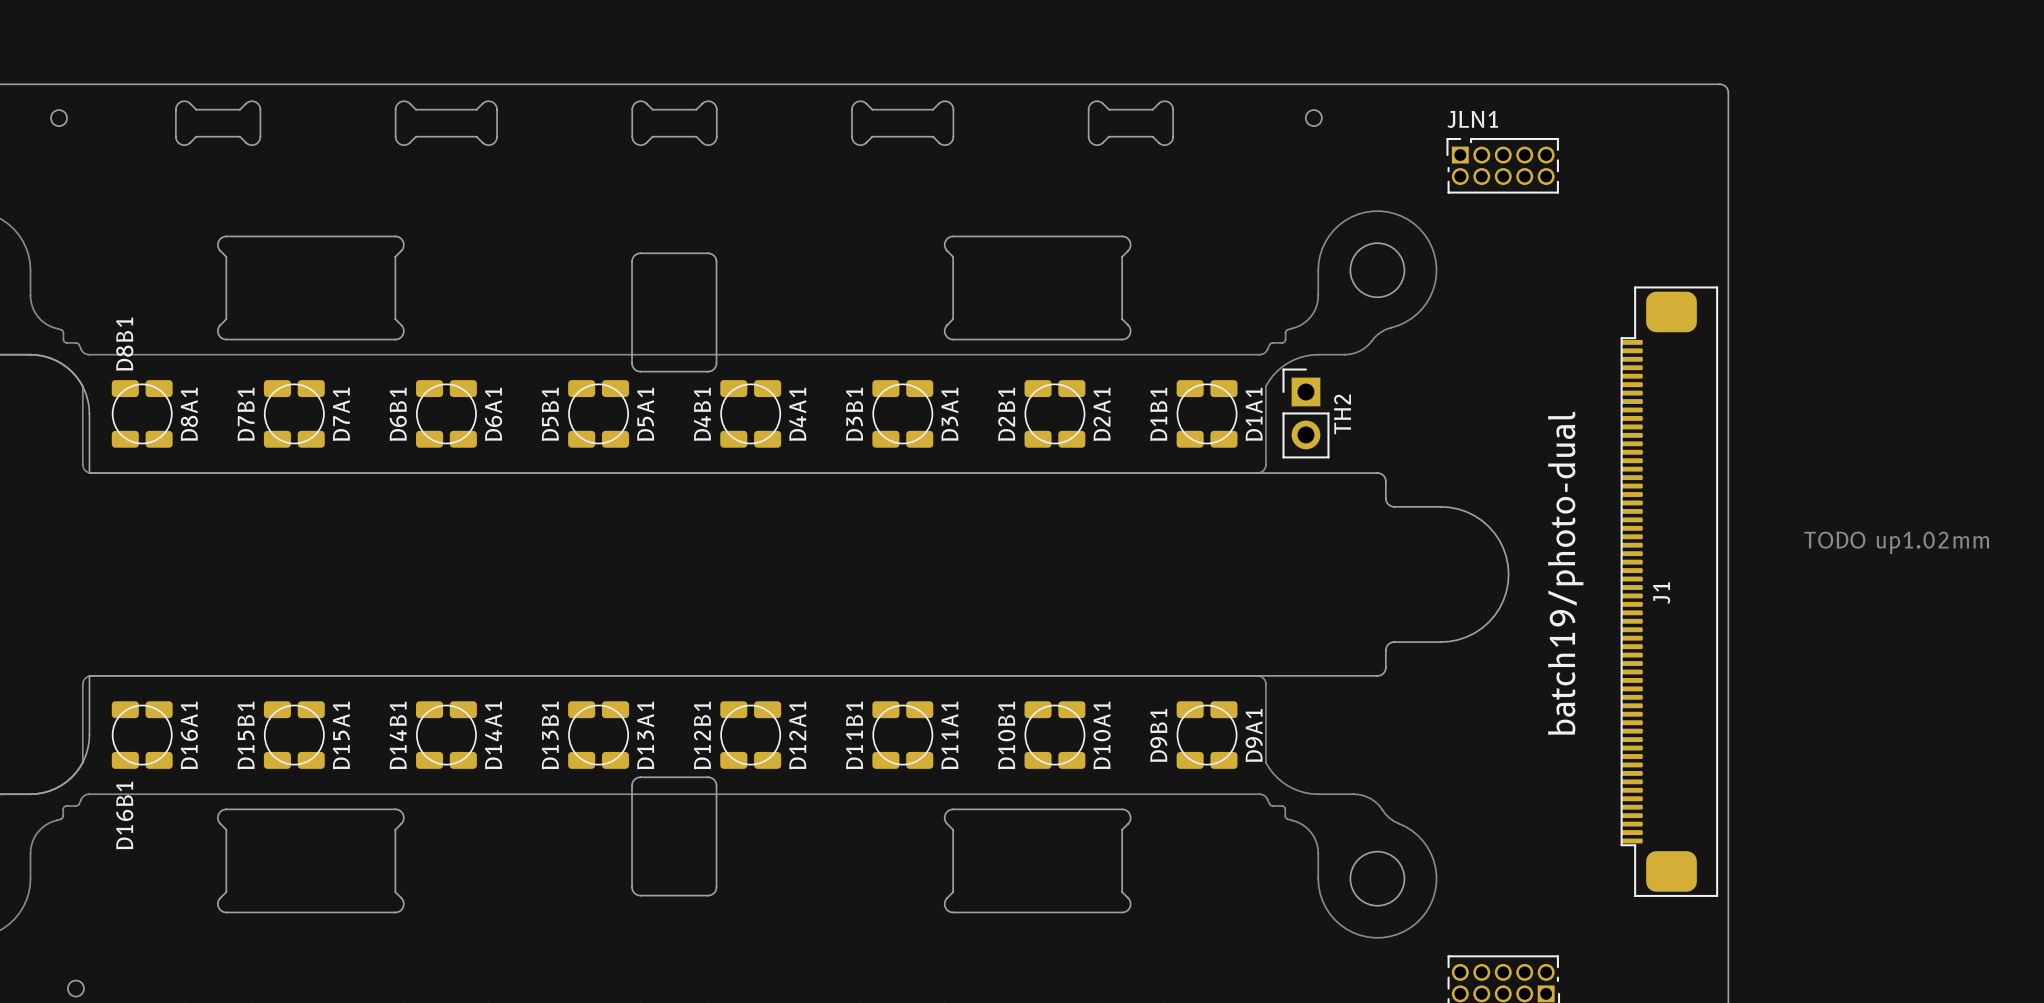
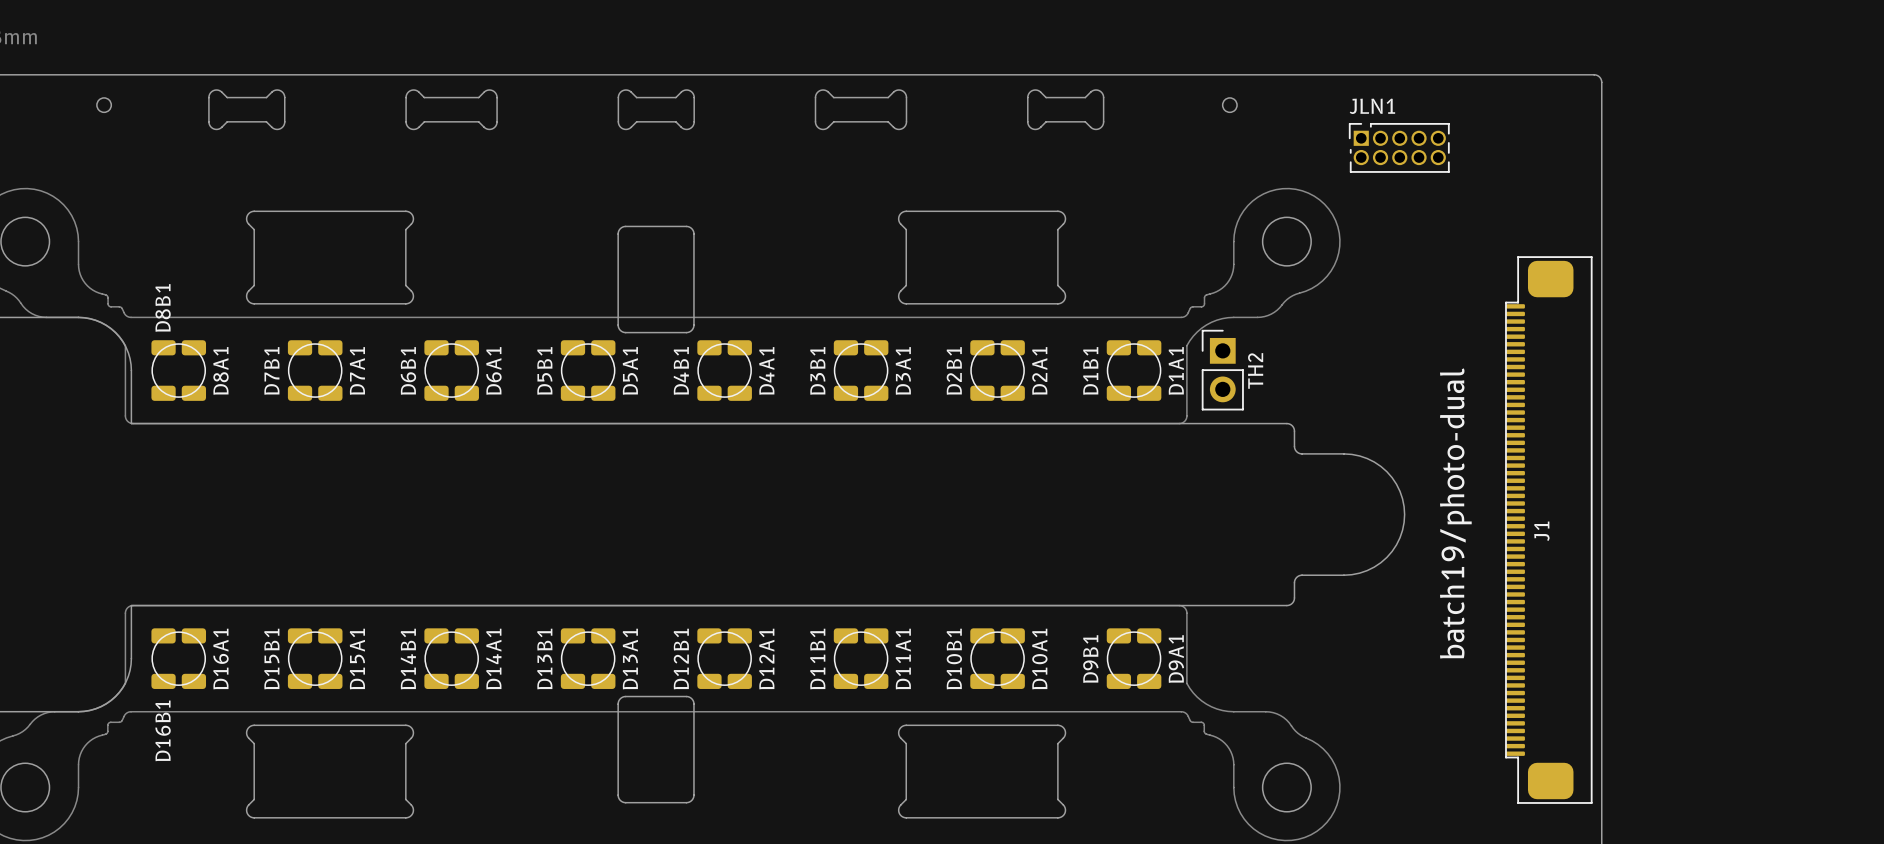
text: TODO up1.02mm (1896, 542) -> none

